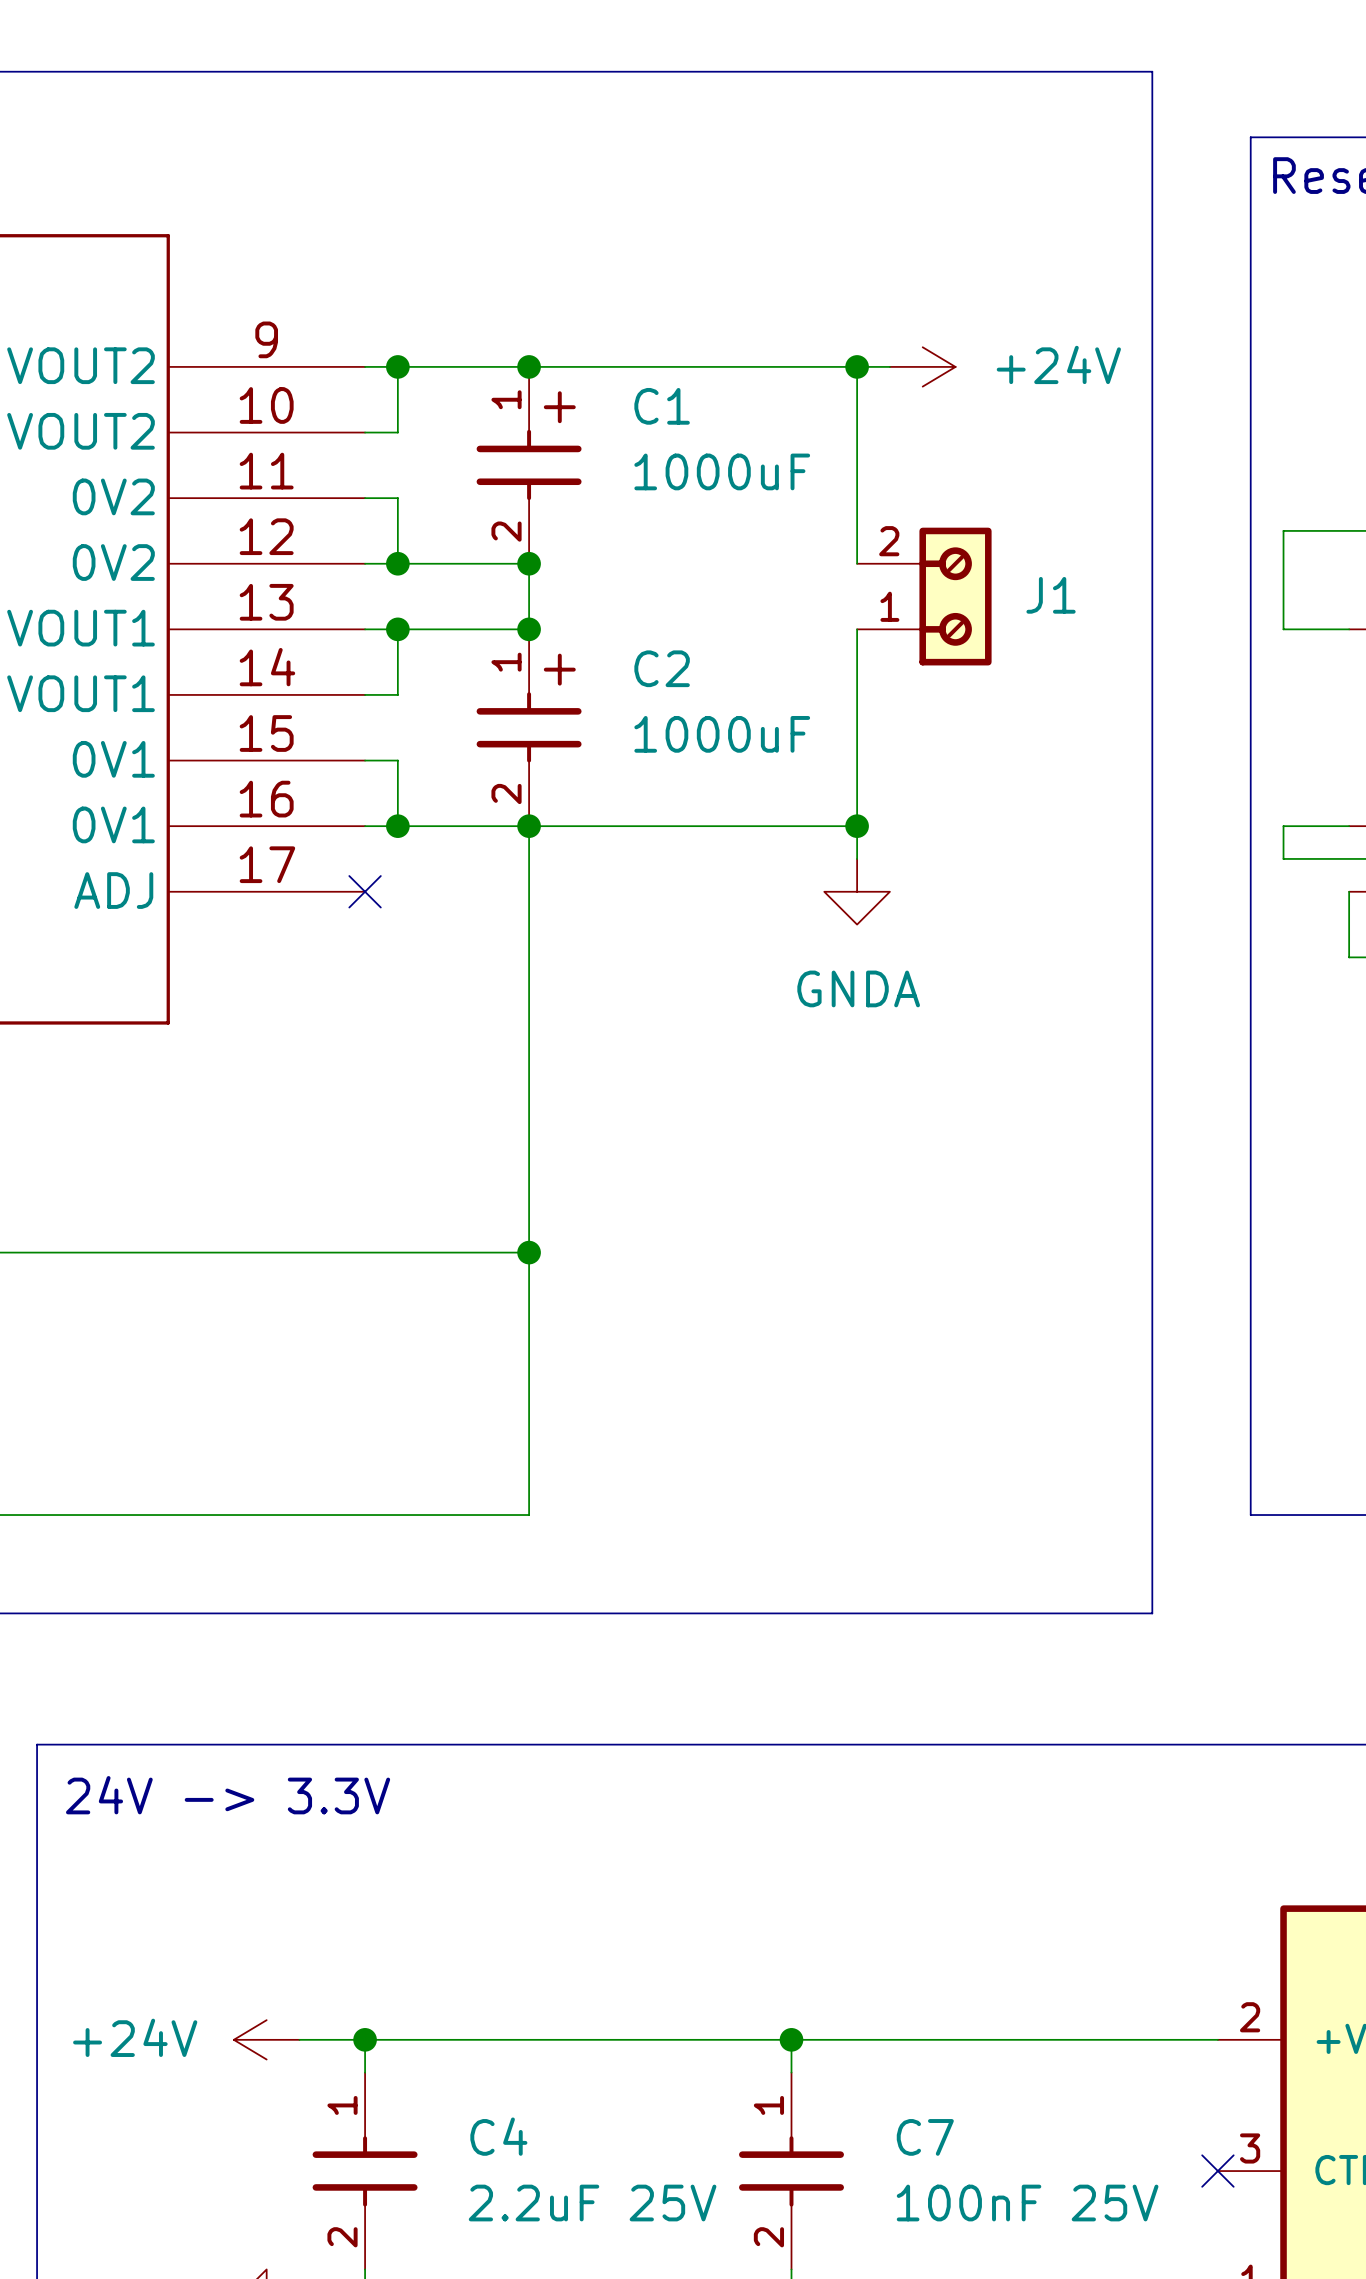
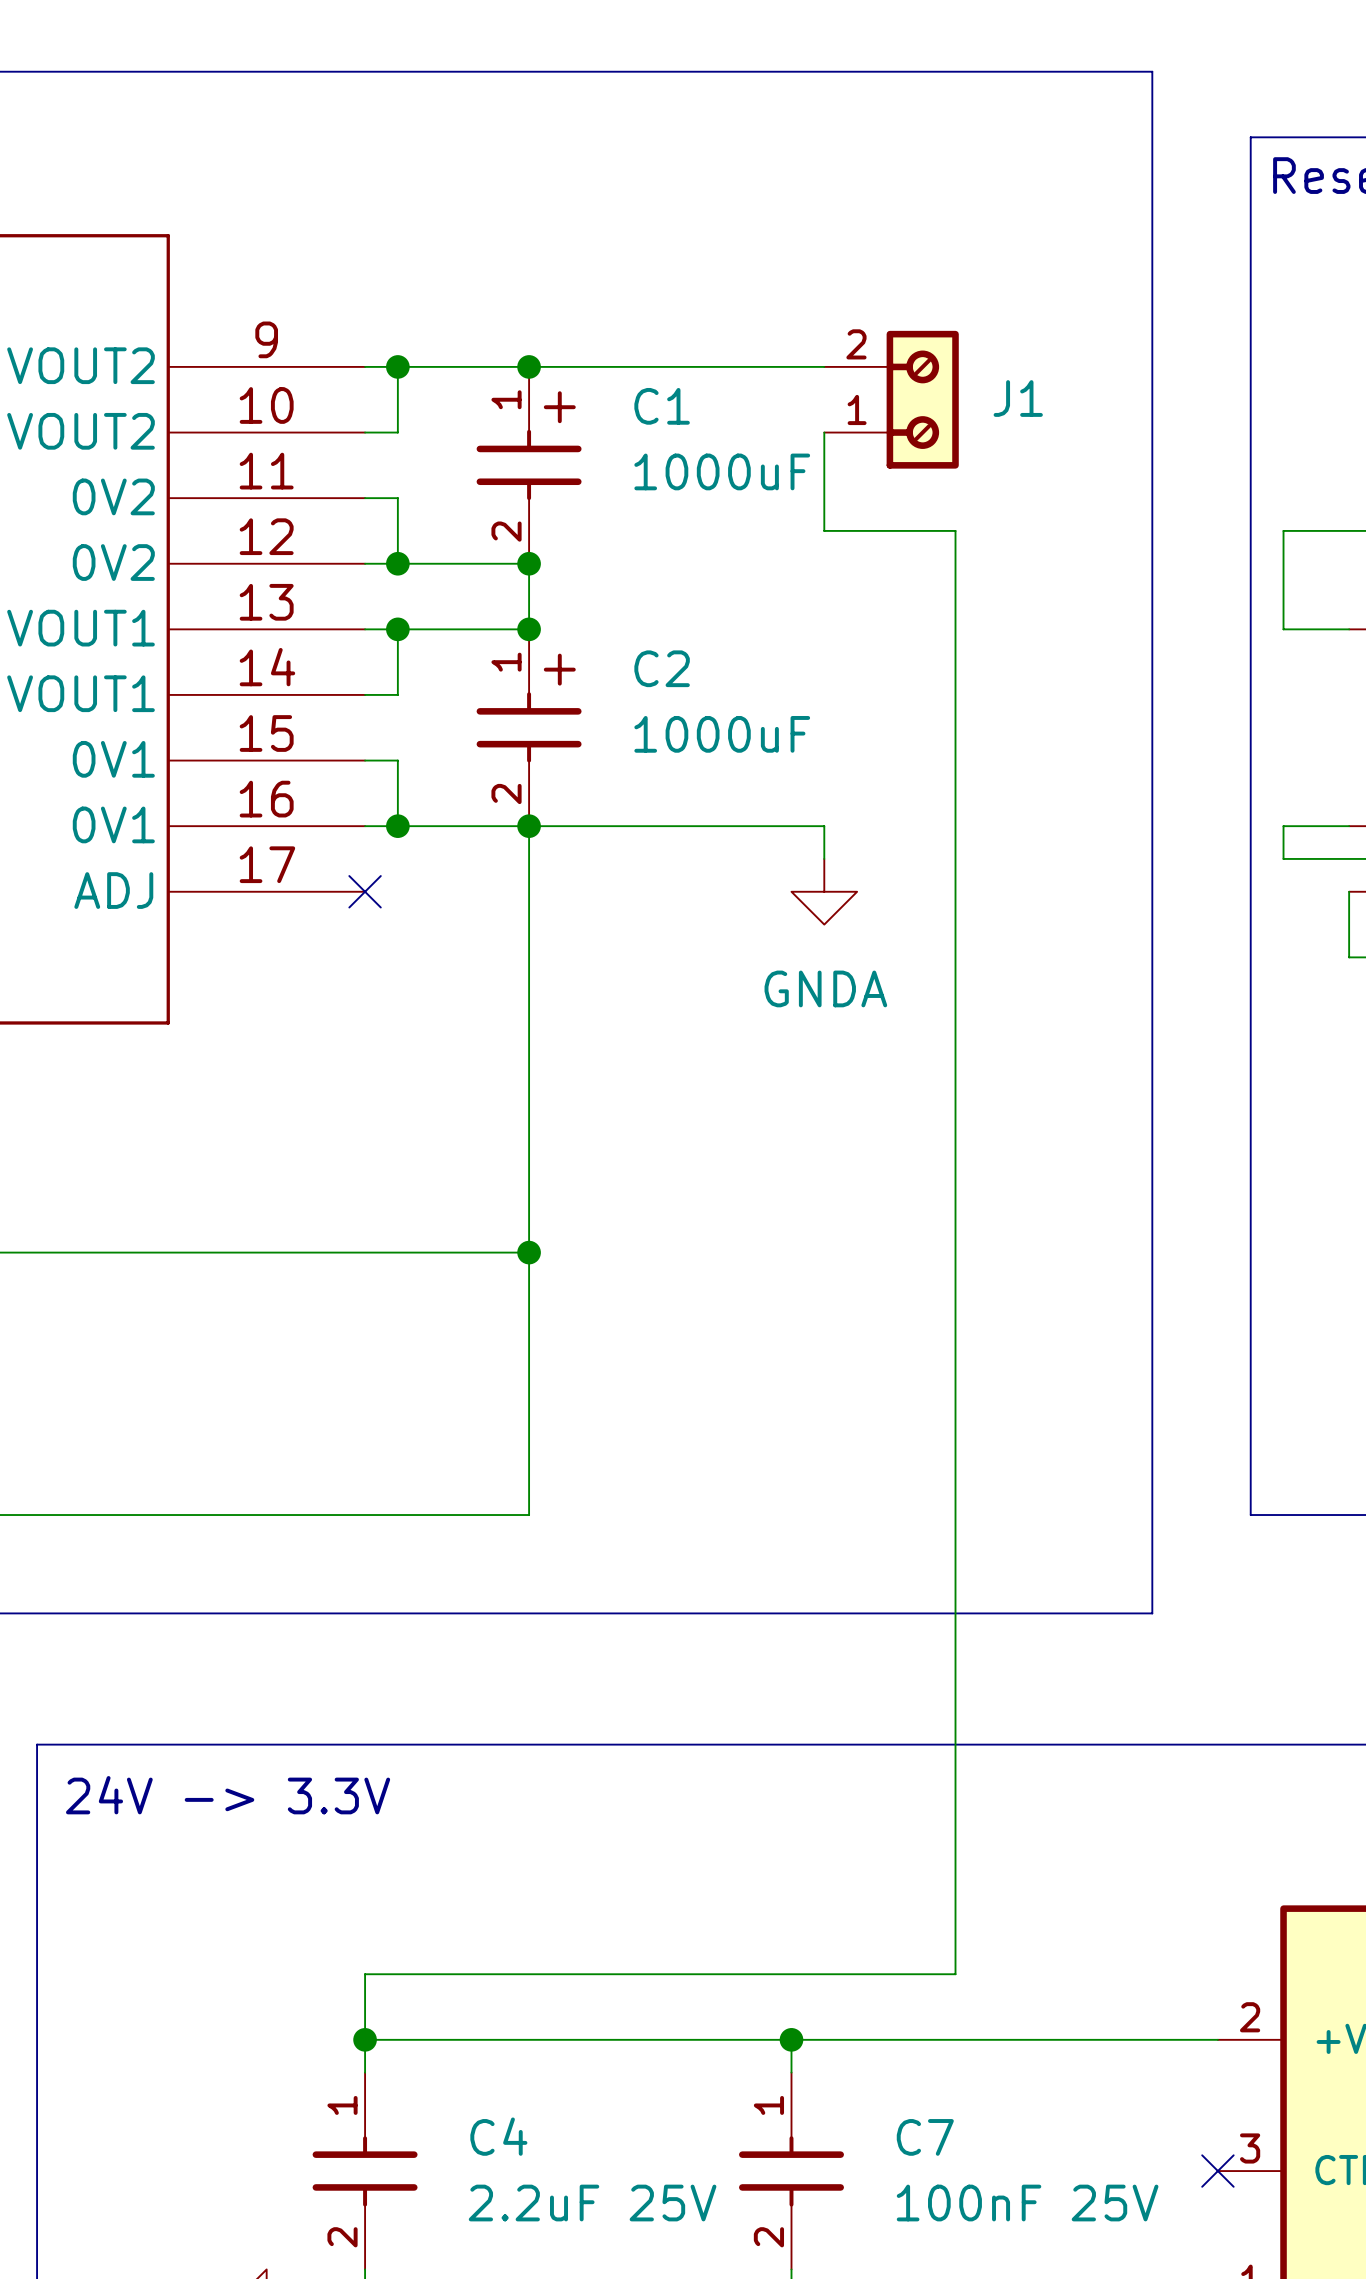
wire: (857, 366) (857, 563) -> none
junction: (857, 366) -> none
power symbol: +24V (922, 366) -> none
J1 position: (924, 596) -> (891, 399)
wire: (857, 629) (857, 858) -> none
wire: (824, 826) (857, 826) -> (824, 826) (824, 858)
junction: (857, 826) -> none
power symbol position: GNDA (857, 891) -> GNDA (824, 891)
power symbol: +24V (266, 2039) -> none
wire: (299, 2039) (365, 2039) -> (824, 432) (824, 530) (955, 530) (955, 1974) (365, 1974) (365, 2039)

